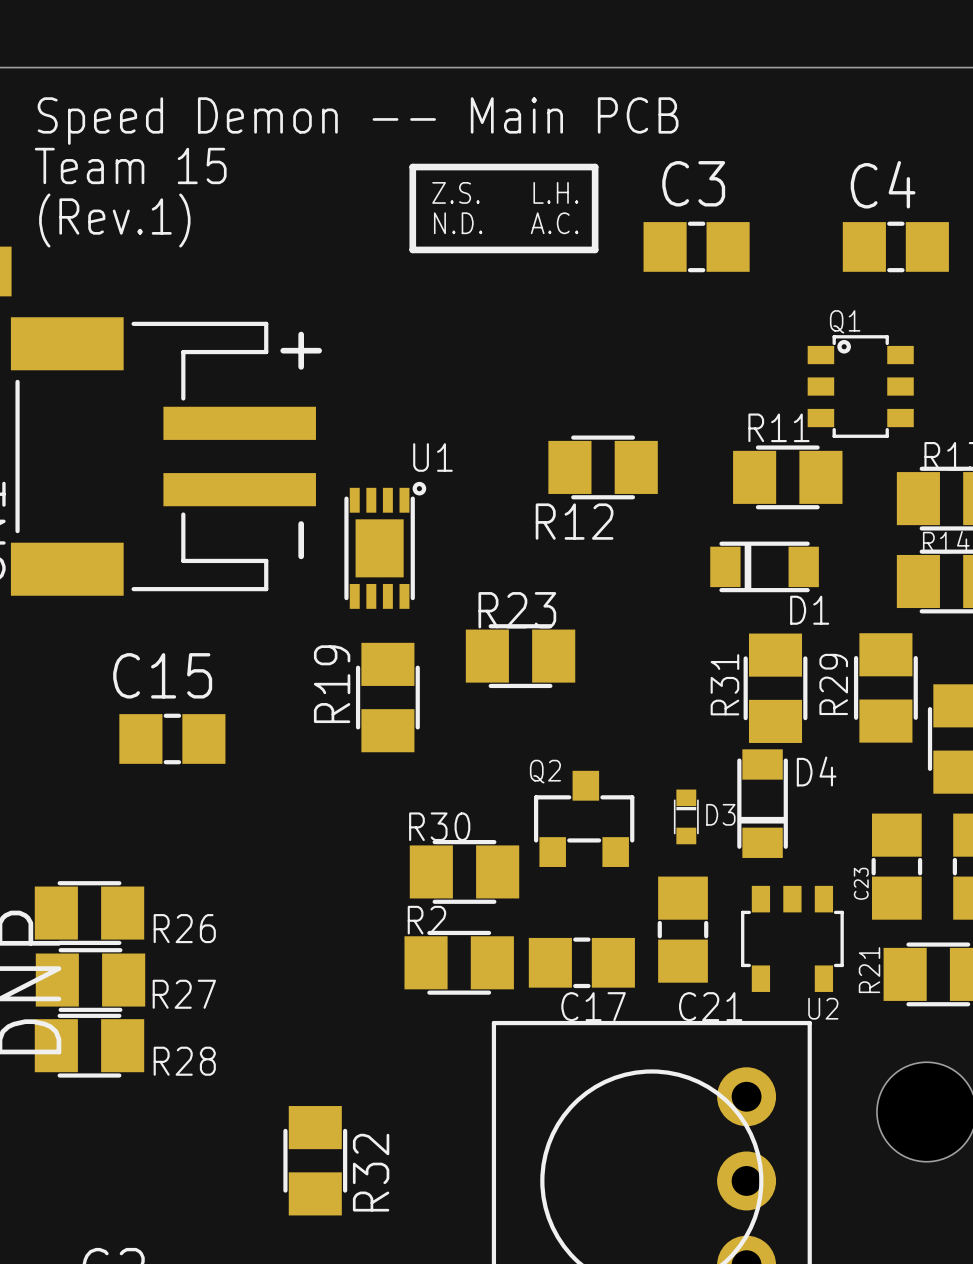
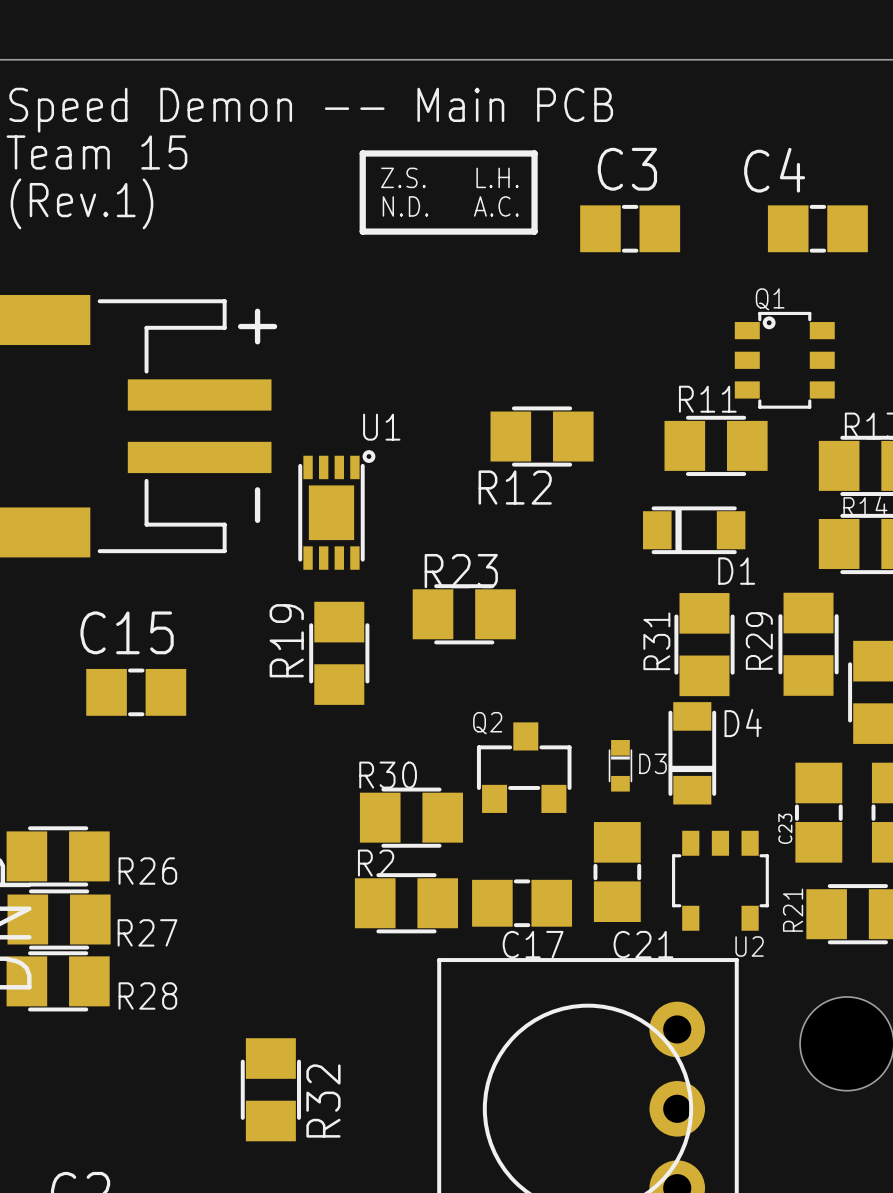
C4 name position: C4 (883, 184) -> C4 (774, 170)

